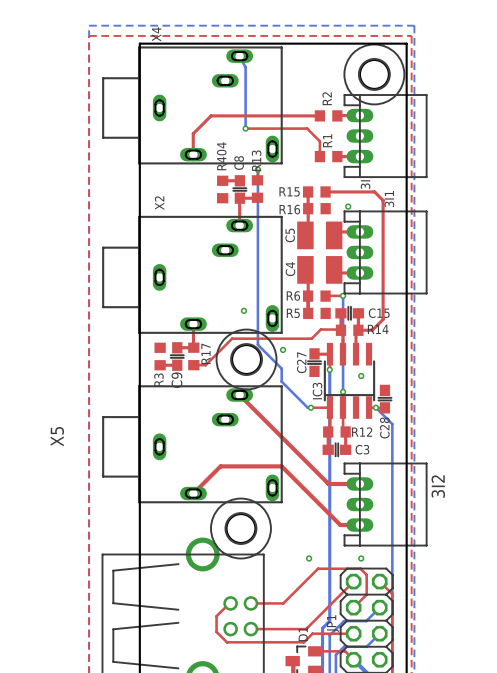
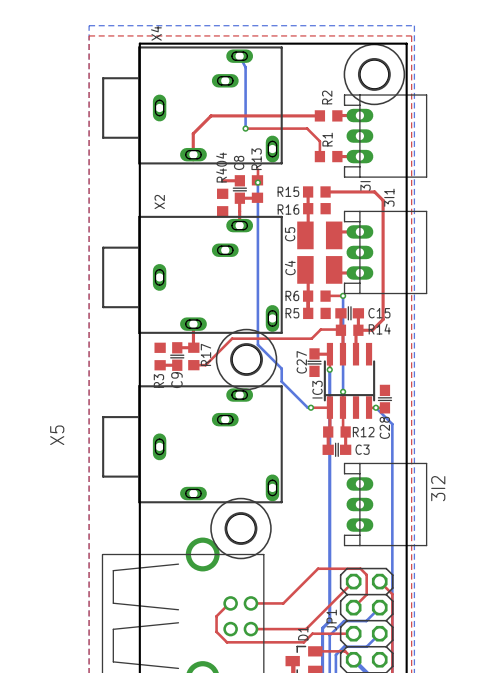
via position: (257, 169) -> (257, 182)
R404 position: (222, 189) -> (222, 202)
via: (348, 206) -> none
via: (243, 310) -> none
via: (283, 349) -> none
via: (361, 376) -> none
top track: (239, 395) (328, 483) (359, 483) -> none
top track: (193, 493) (220, 466) (281, 466) (340, 525) (359, 525) -> none
via: (309, 558) -> none
via: (361, 558) -> none

